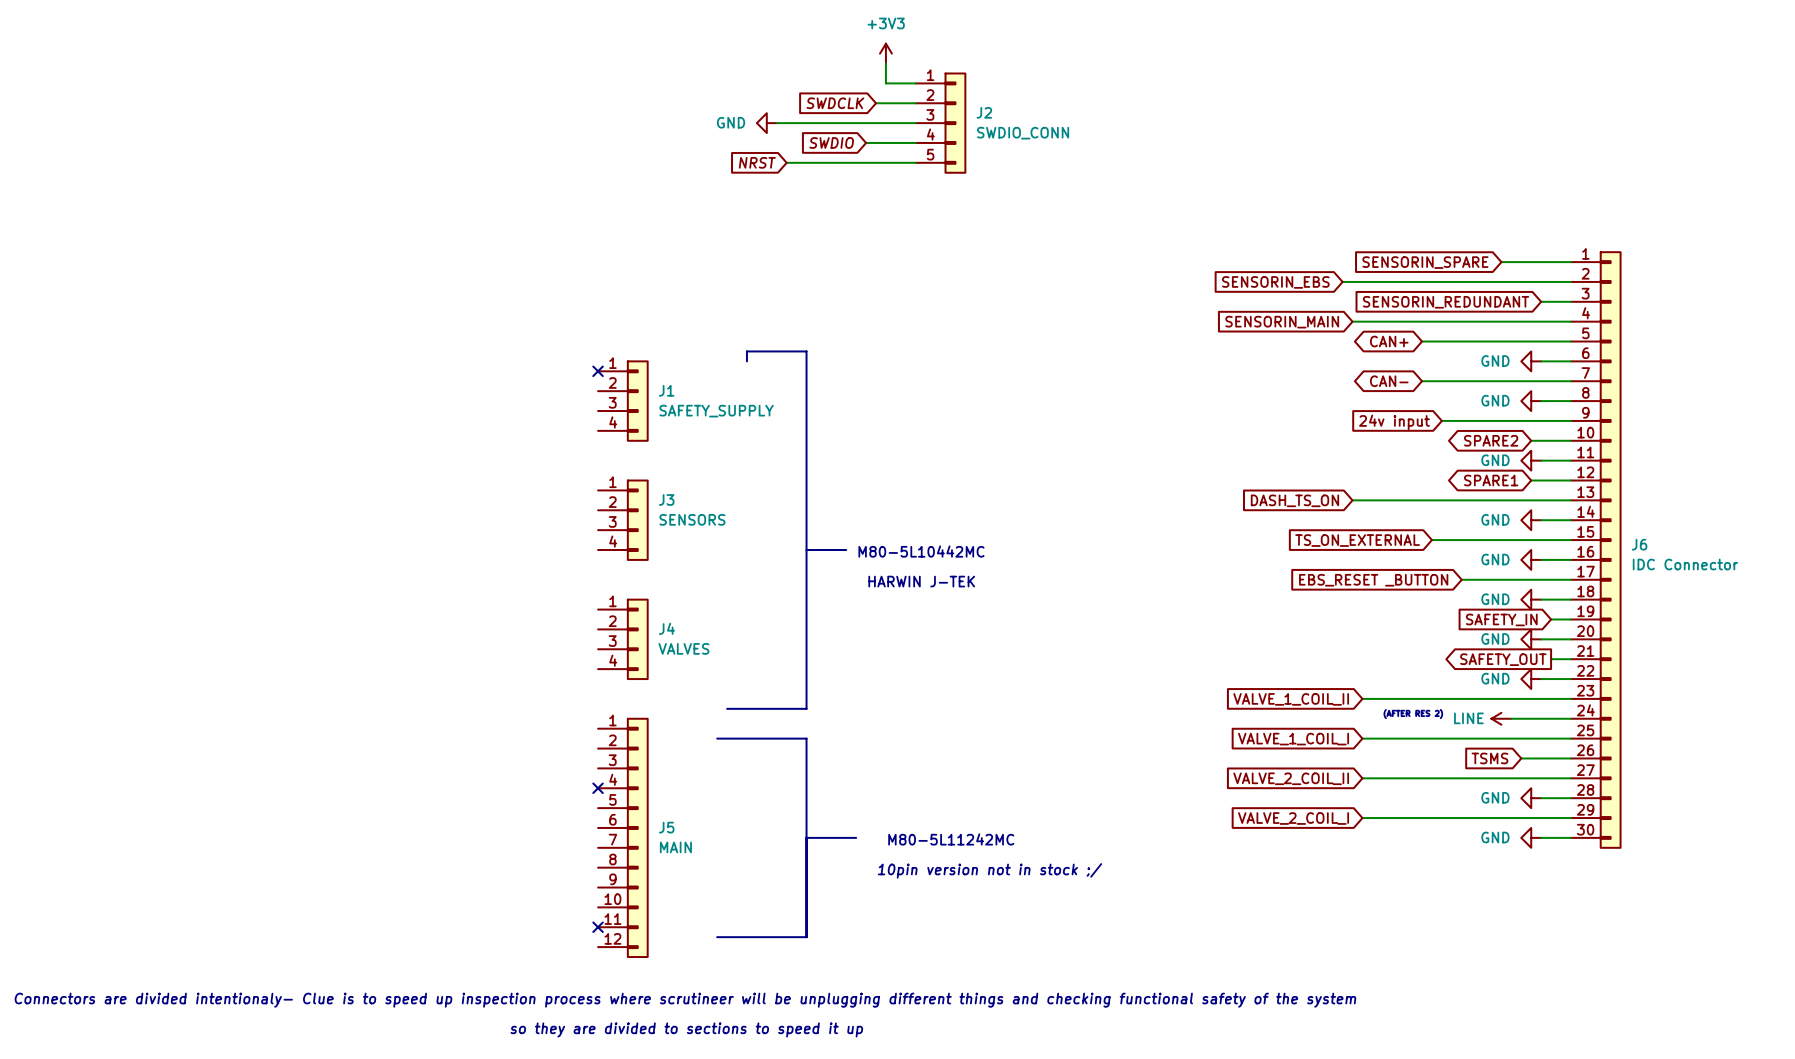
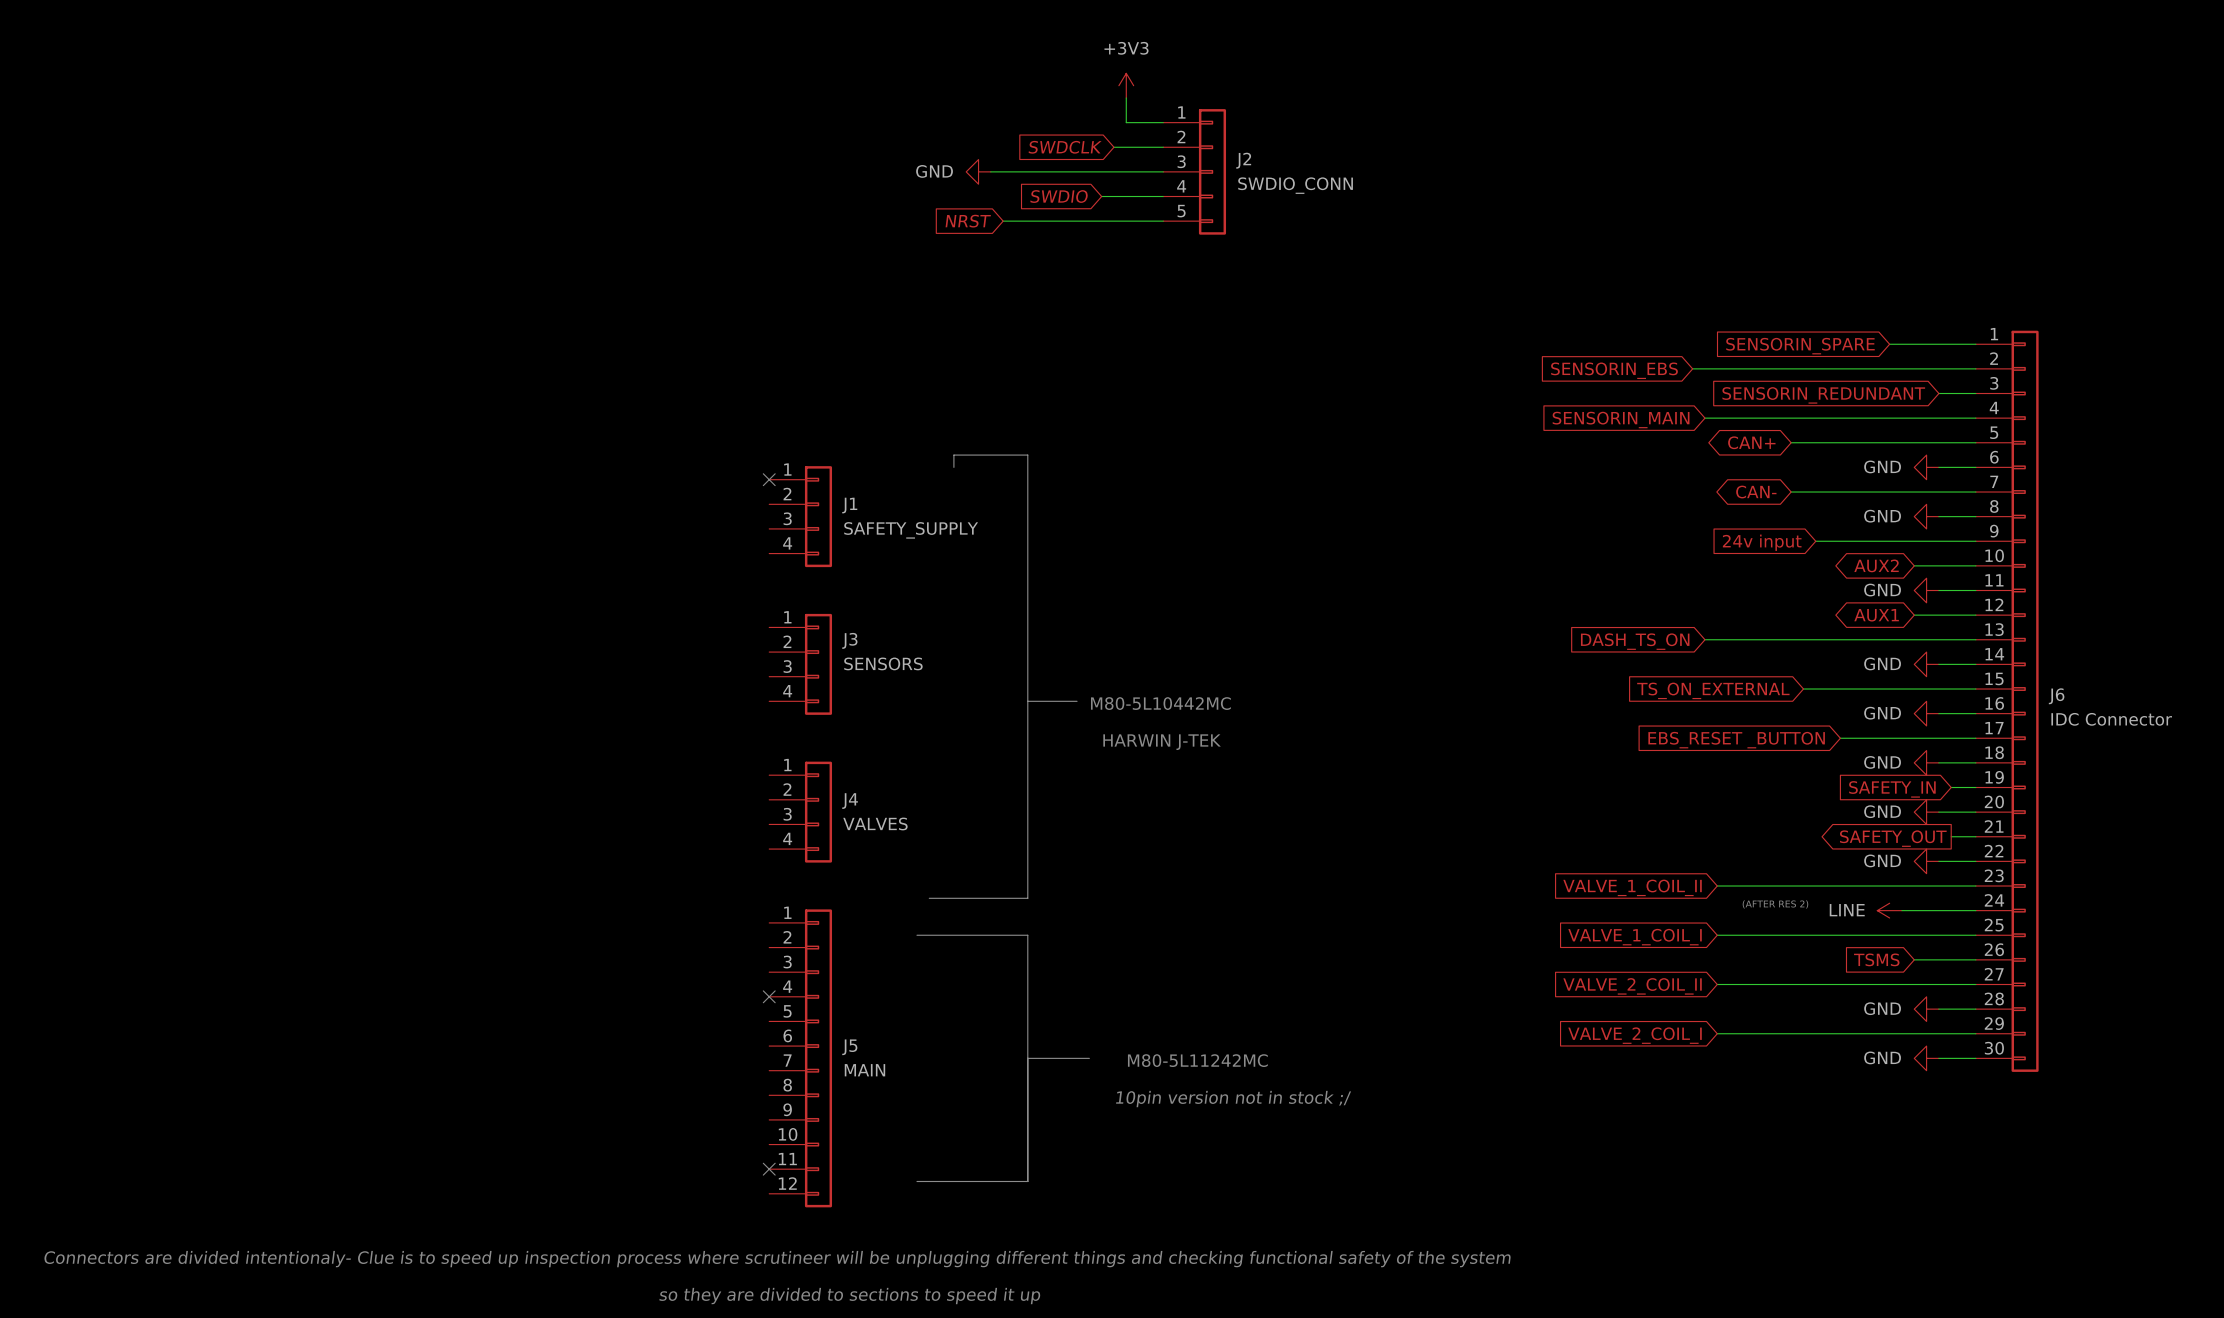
global label: none -> AUX2 (1876, 565)
global label: SPARE2 (1491, 440) -> none
wire: none -> (1914, 565) (1926, 565)
global label: none -> AUX1 (1876, 615)
global label: SPARE1 (1491, 480) -> none
wire: none -> (1914, 615) (1926, 615)

